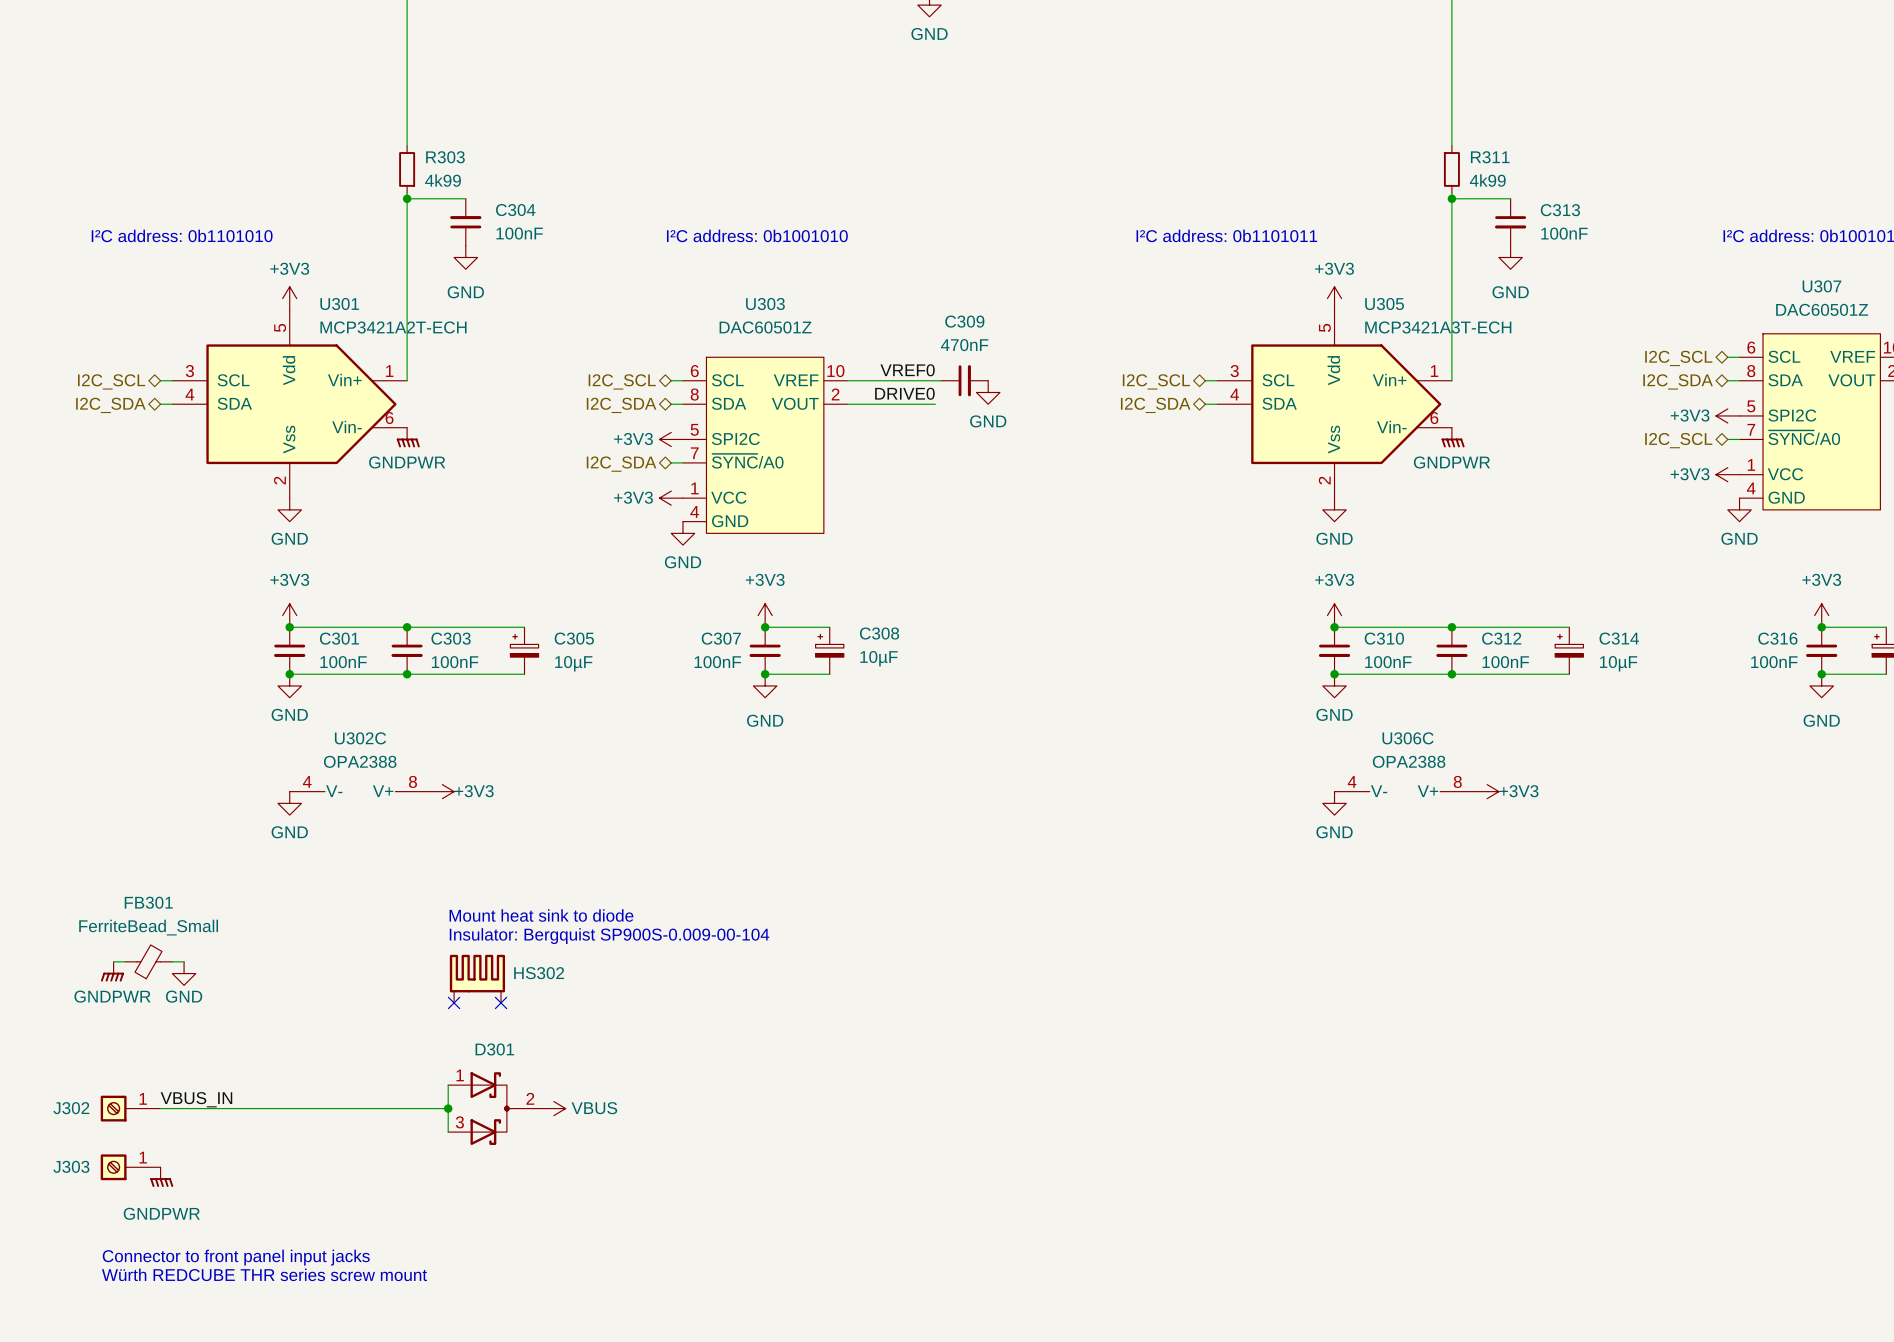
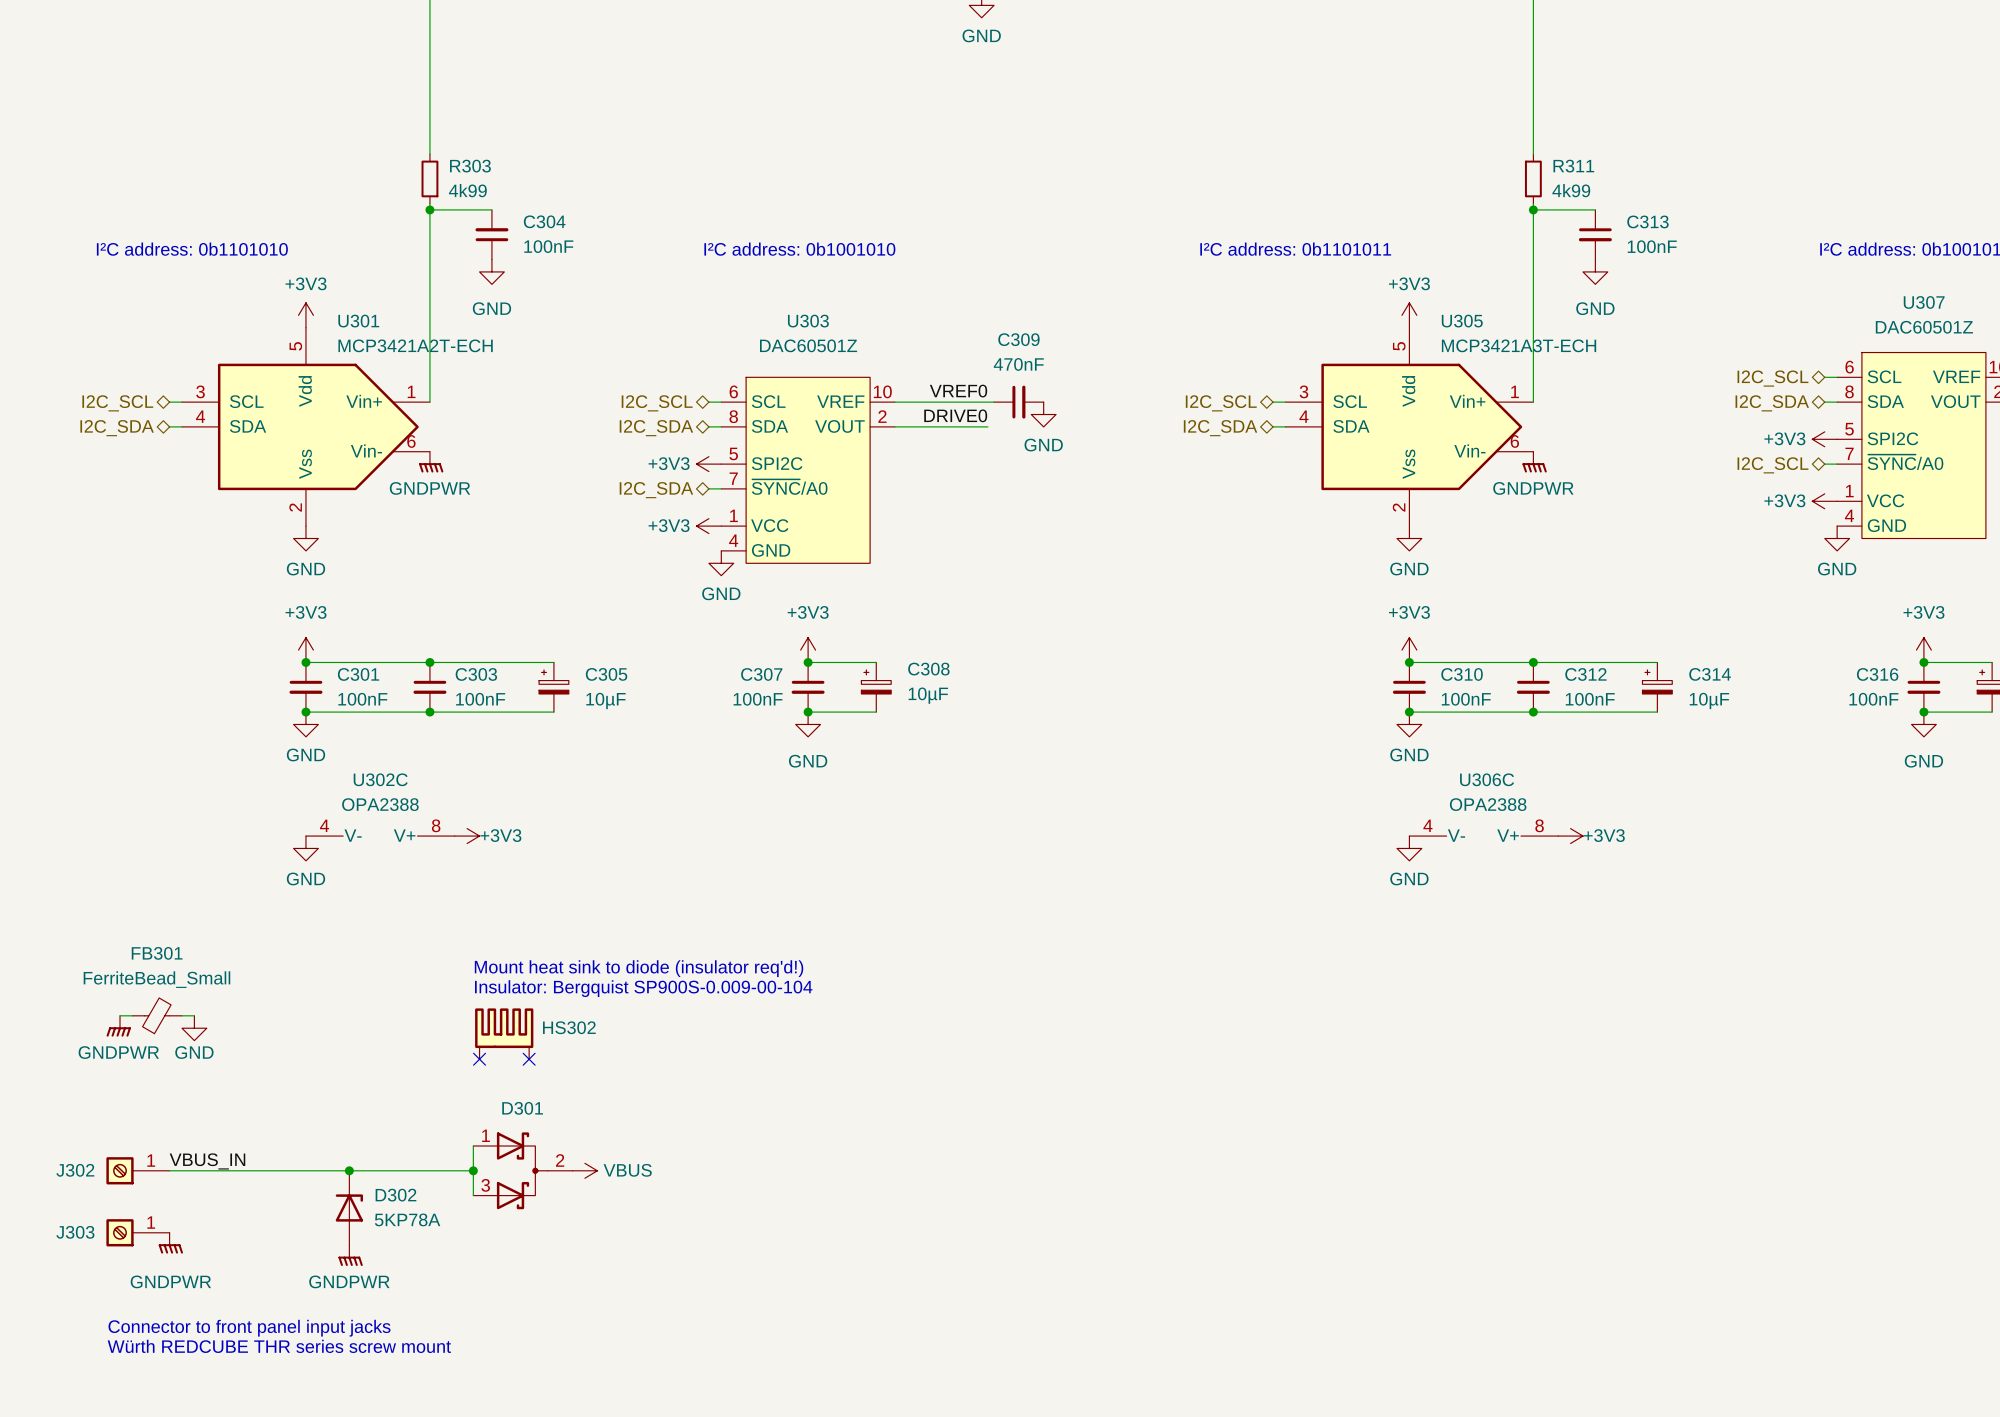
text: Mount heat sink to diode (541, 915) -> Mount heat sink to diode (insulator req'd!) (639, 968)
junction: none -> (349, 1170)
D302: none -> 5KP78A (349, 1207)
power symbol: none -> GNDPWR (350, 1255)

